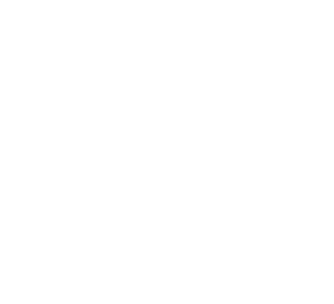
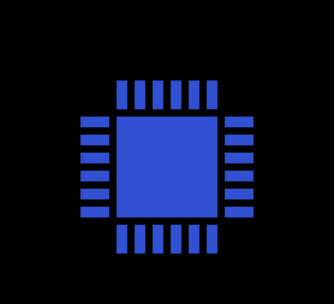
part: none -> (167, 167)

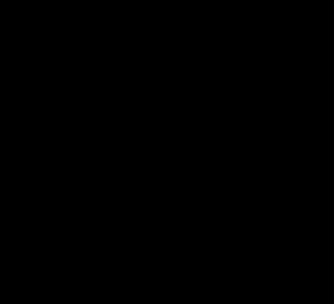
part: (167, 167) -> none

